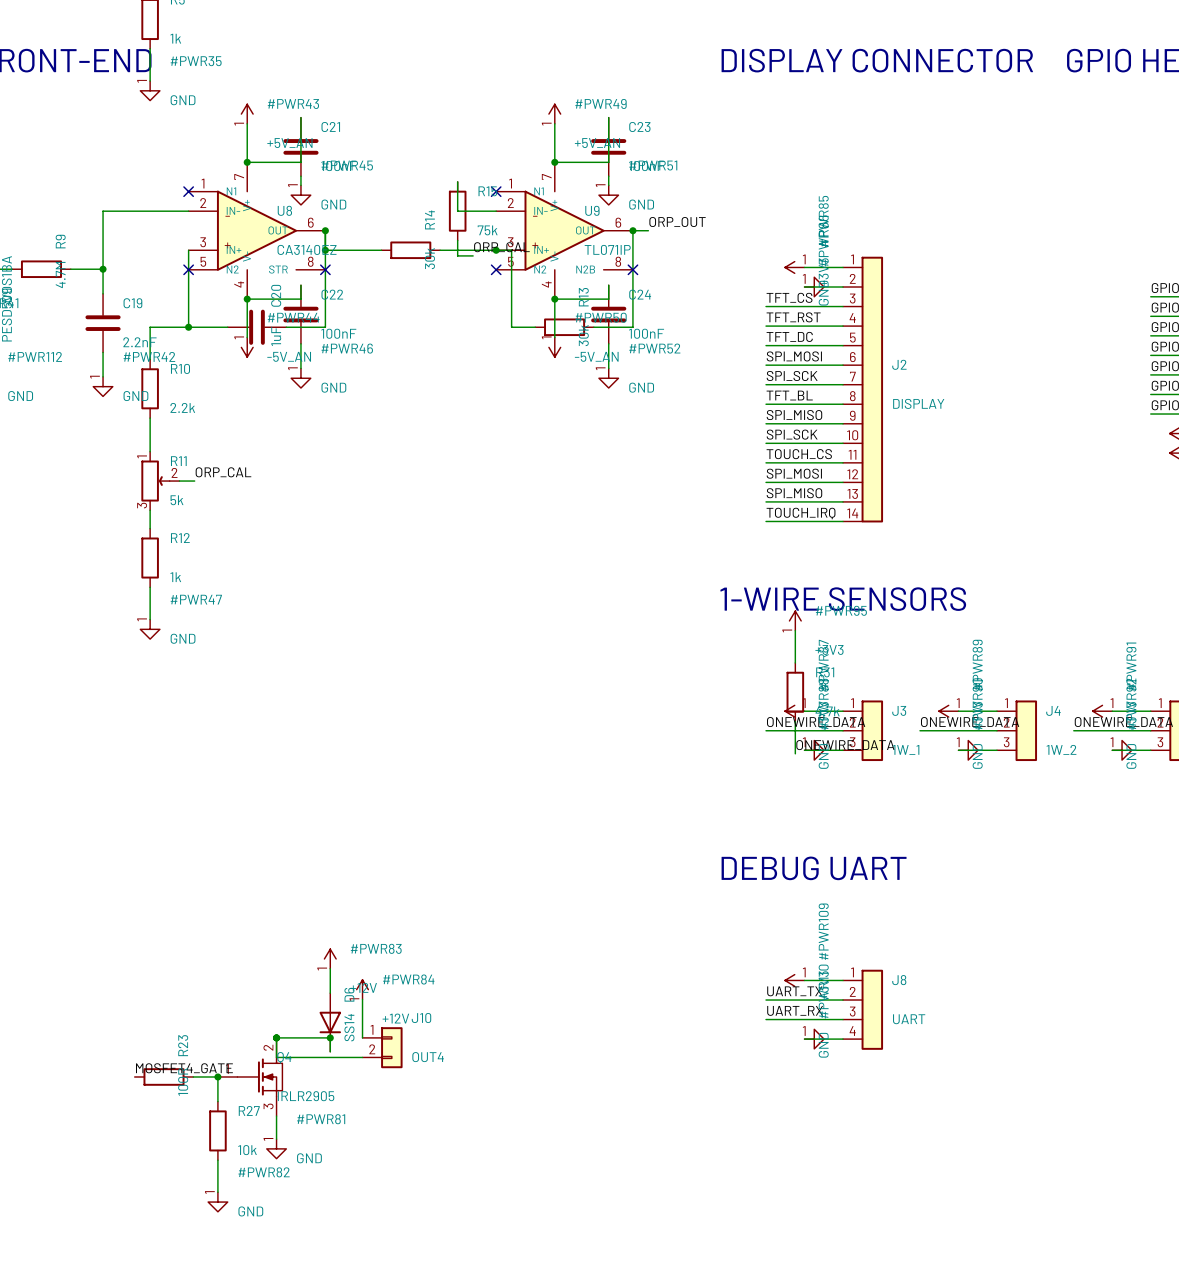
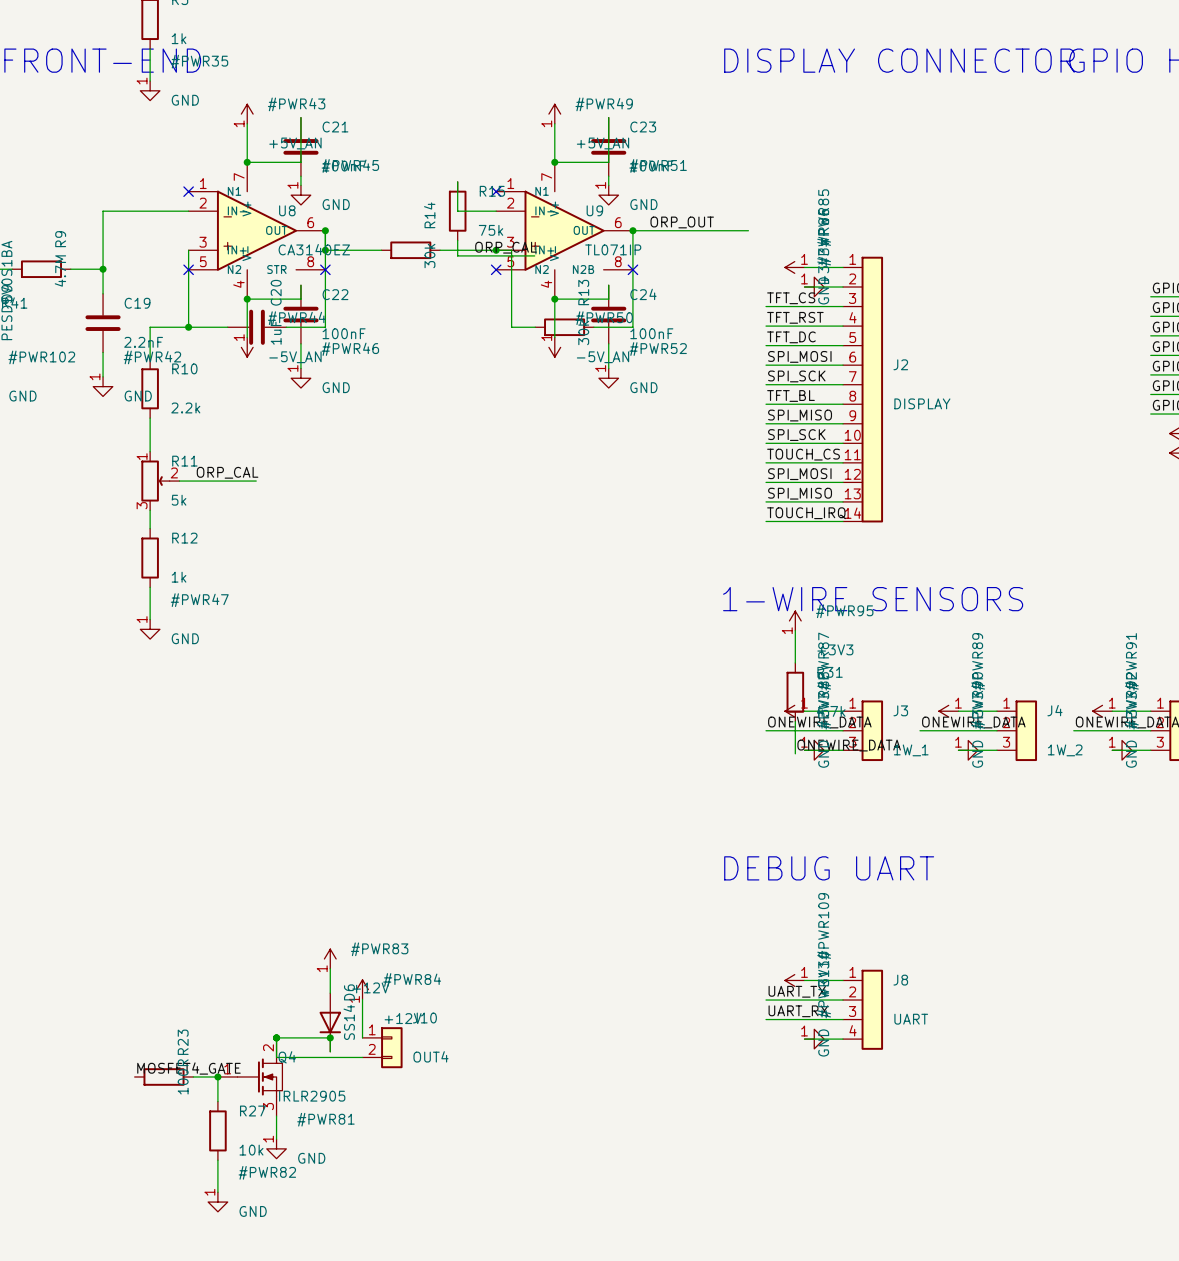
wire: none -> (648, 230) (748, 230)
wire: none -> (473, 255) (534, 255)
#PWR112 name: #PWR112 (35, 356) -> #PWR102 (41, 357)
wire: none -> (194, 481) (256, 481)

